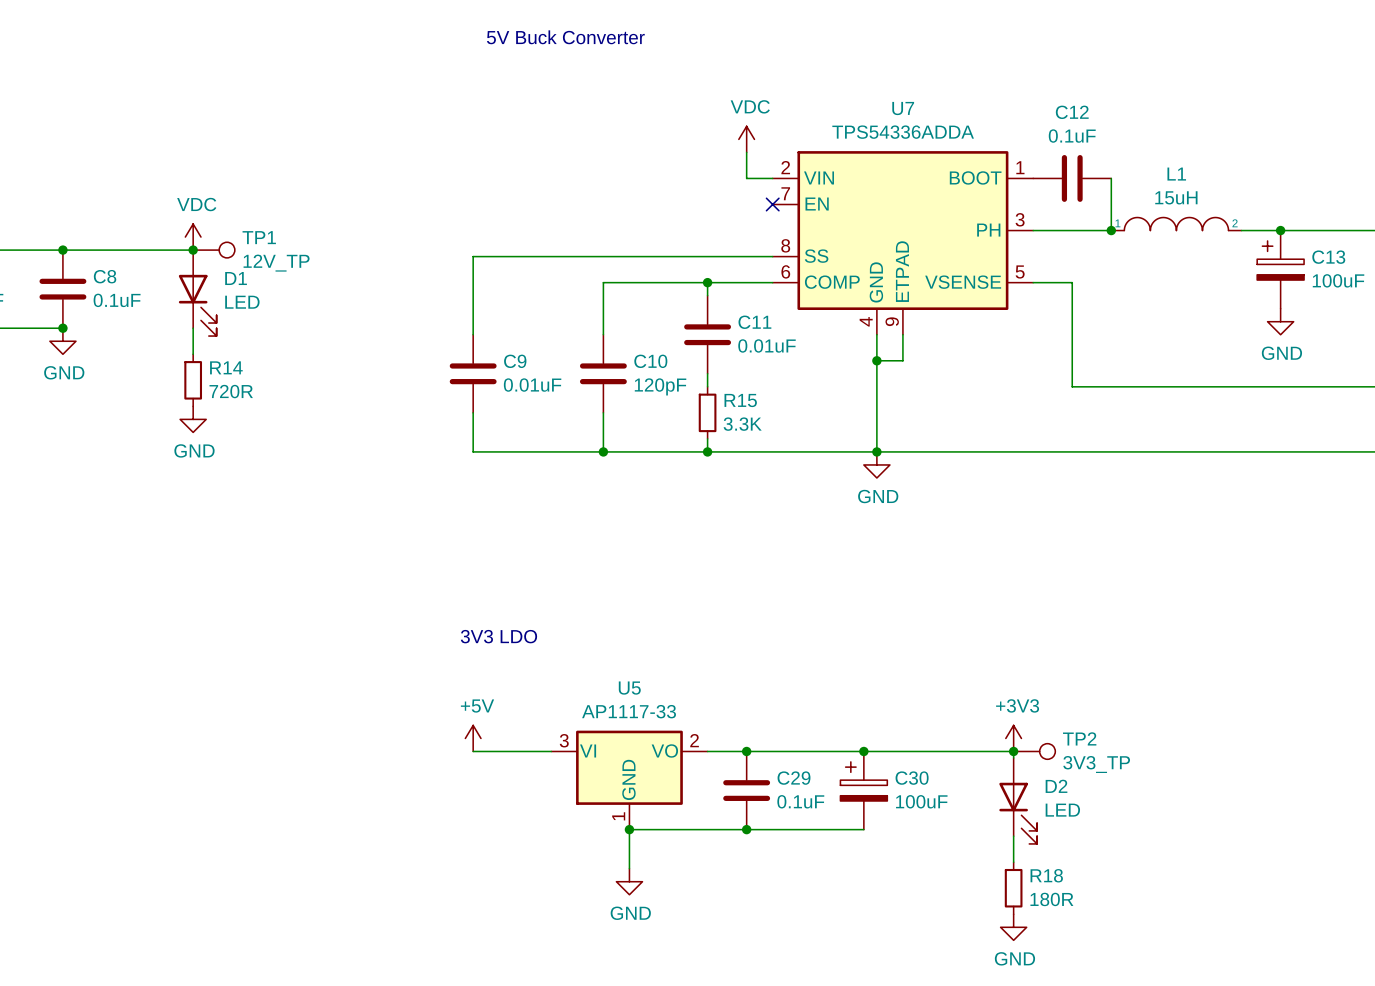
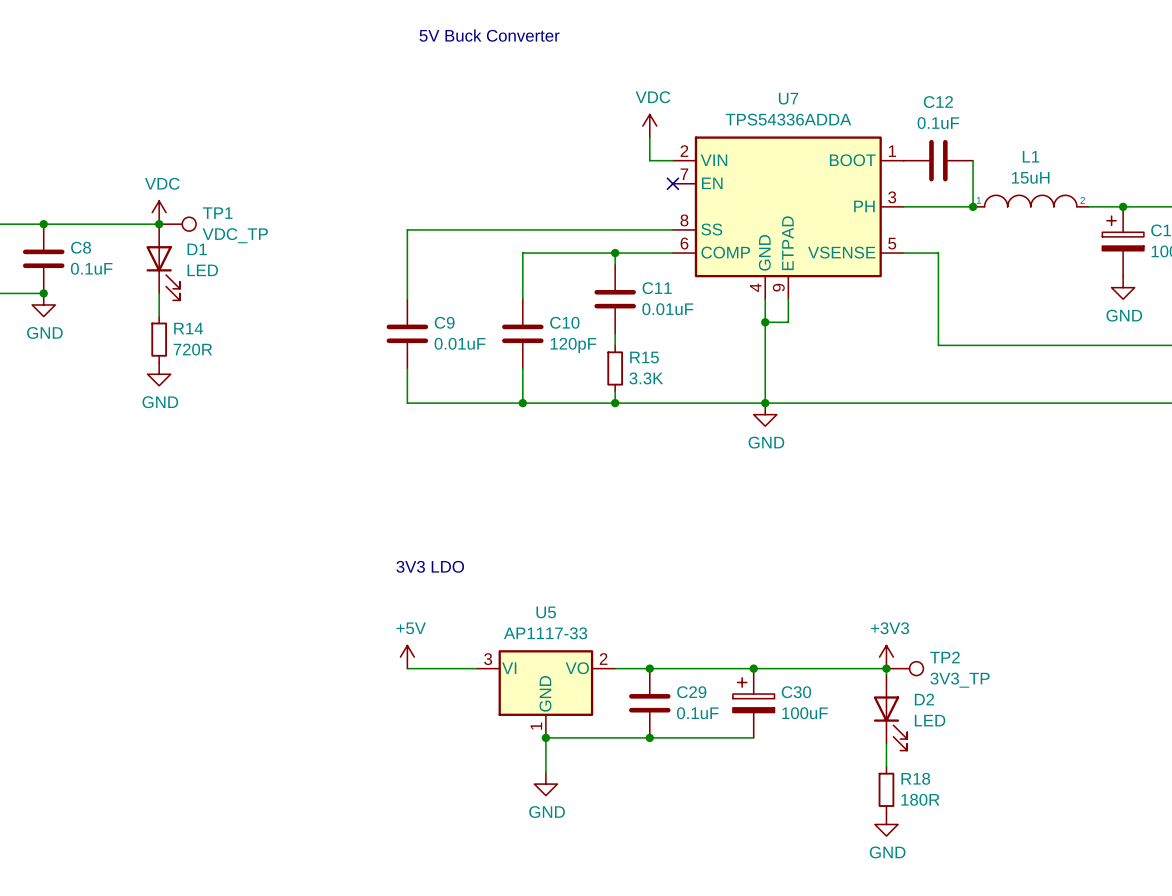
TP1 value: 12V_TP (276, 263) -> VDC_TP (235, 235)

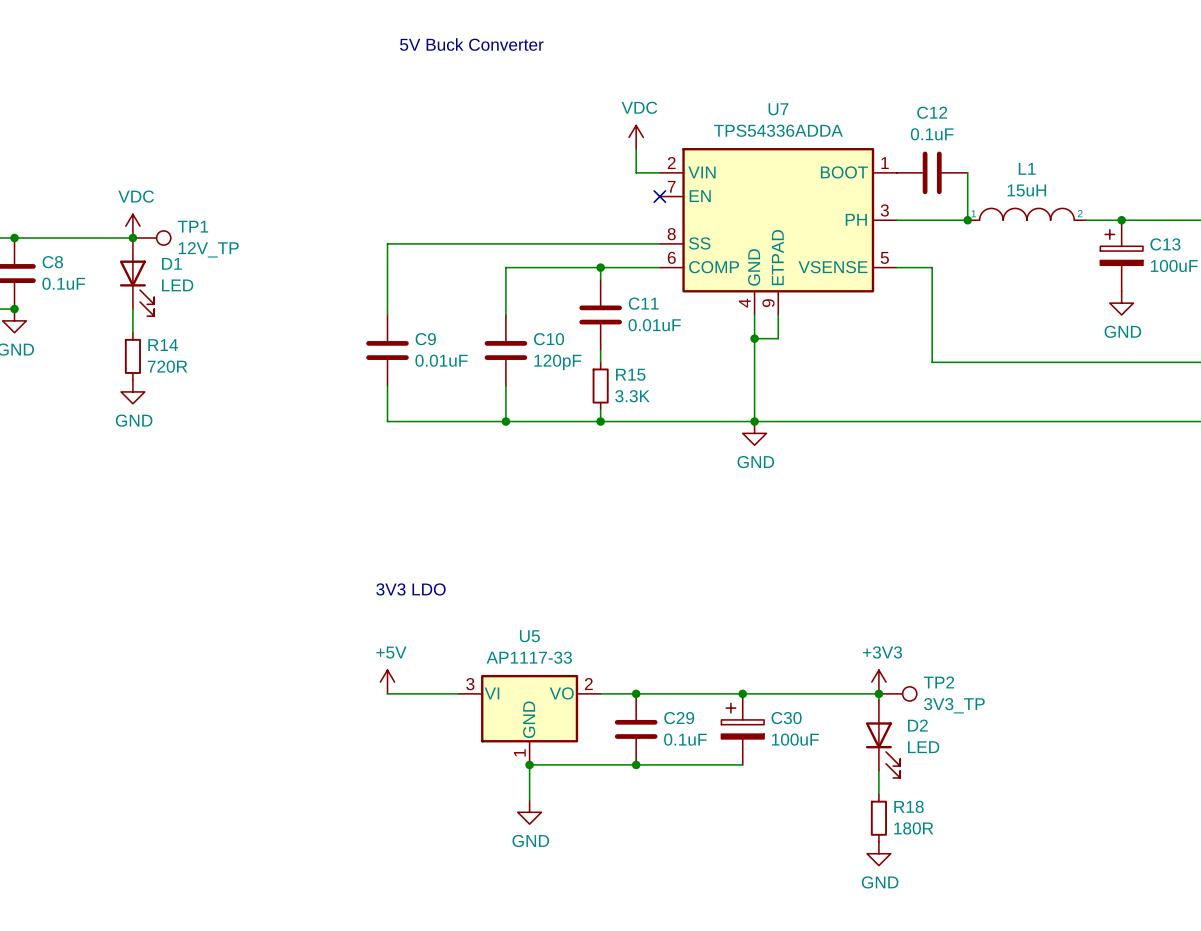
TP1 value: VDC_TP (235, 235) -> 12V_TP (208, 249)

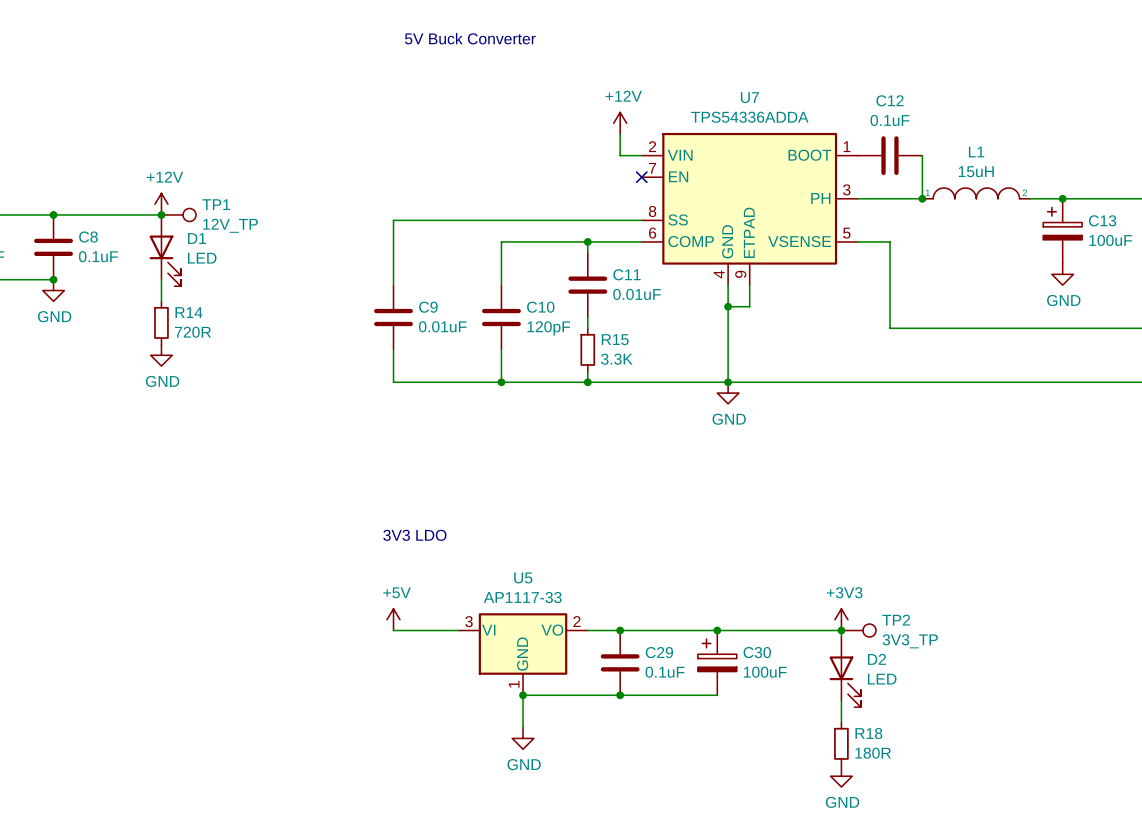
power symbol: VDC (636, 137) -> +12V (620, 123)
power symbol: VDC (132, 226) -> +12V (161, 204)

